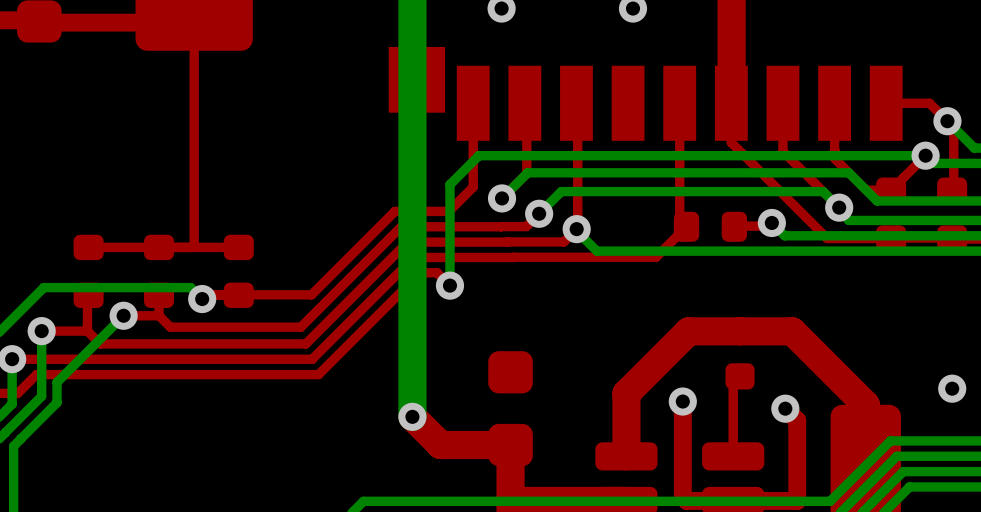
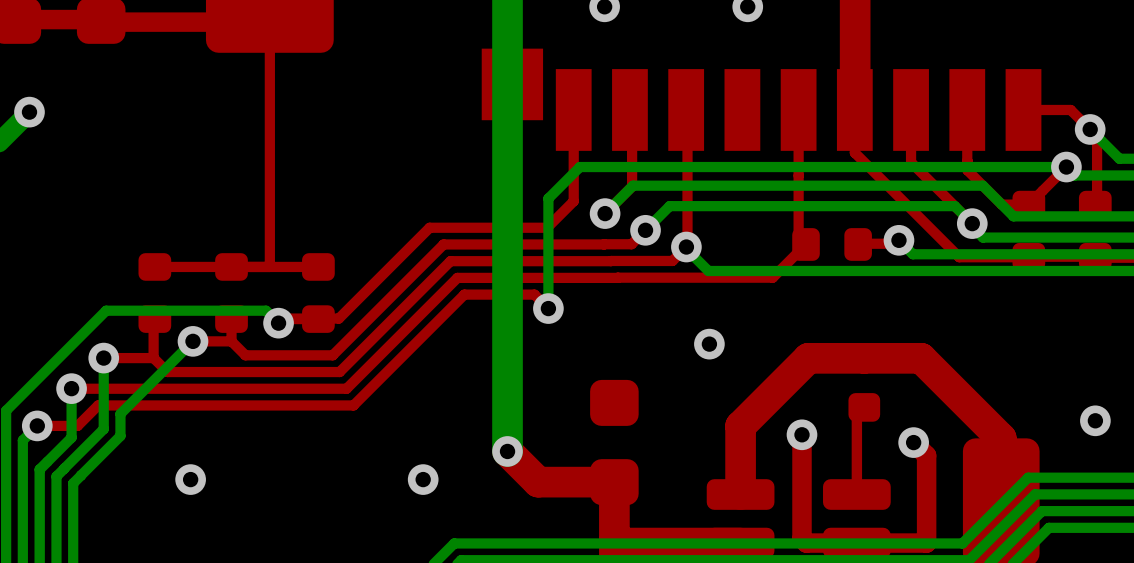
top track: (394, 211) (311, 294) (257, 294) -> (488, 227) (429, 227) (338, 318)
top track: (401, 226) (300, 327) (170, 327) -> (495, 244) (443, 244) (332, 355) (243, 353)
top track: (407, 242) (305, 343) (258, 343) -> (502, 261) (450, 261) (339, 372)
top track: (414, 257) (312, 359) (264, 359) -> (509, 277) (457, 277) (346, 388)
top track: (420, 272) (318, 374) (271, 374) -> (516, 294) (464, 294) (353, 405)
via: none -> (709, 344)
via: none -> (190, 479)
via: none -> (423, 479)

